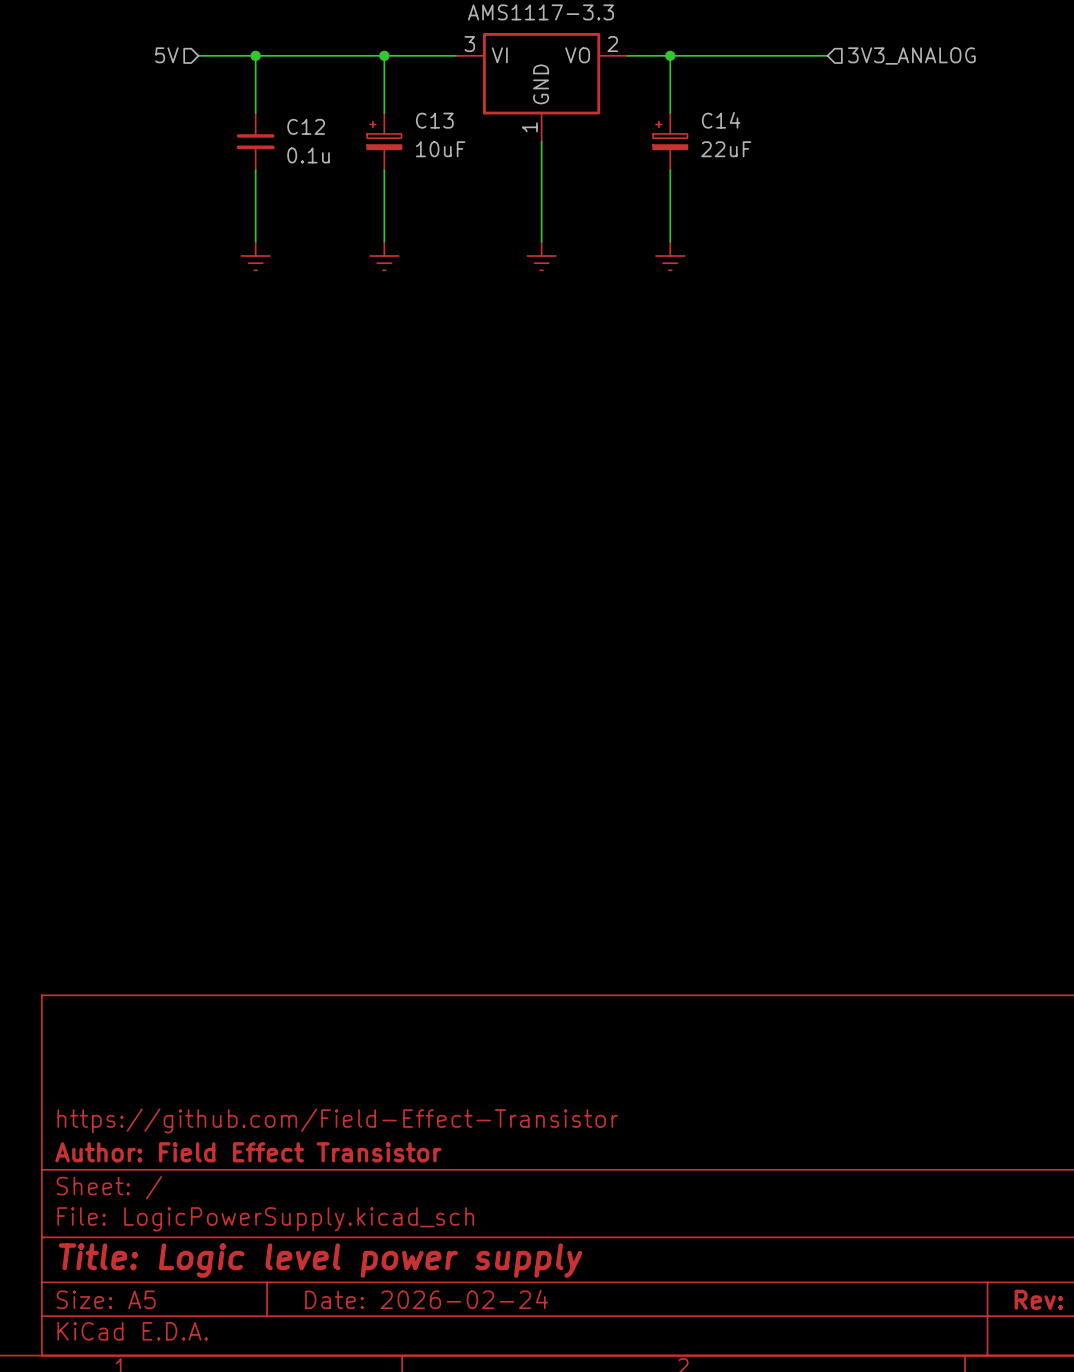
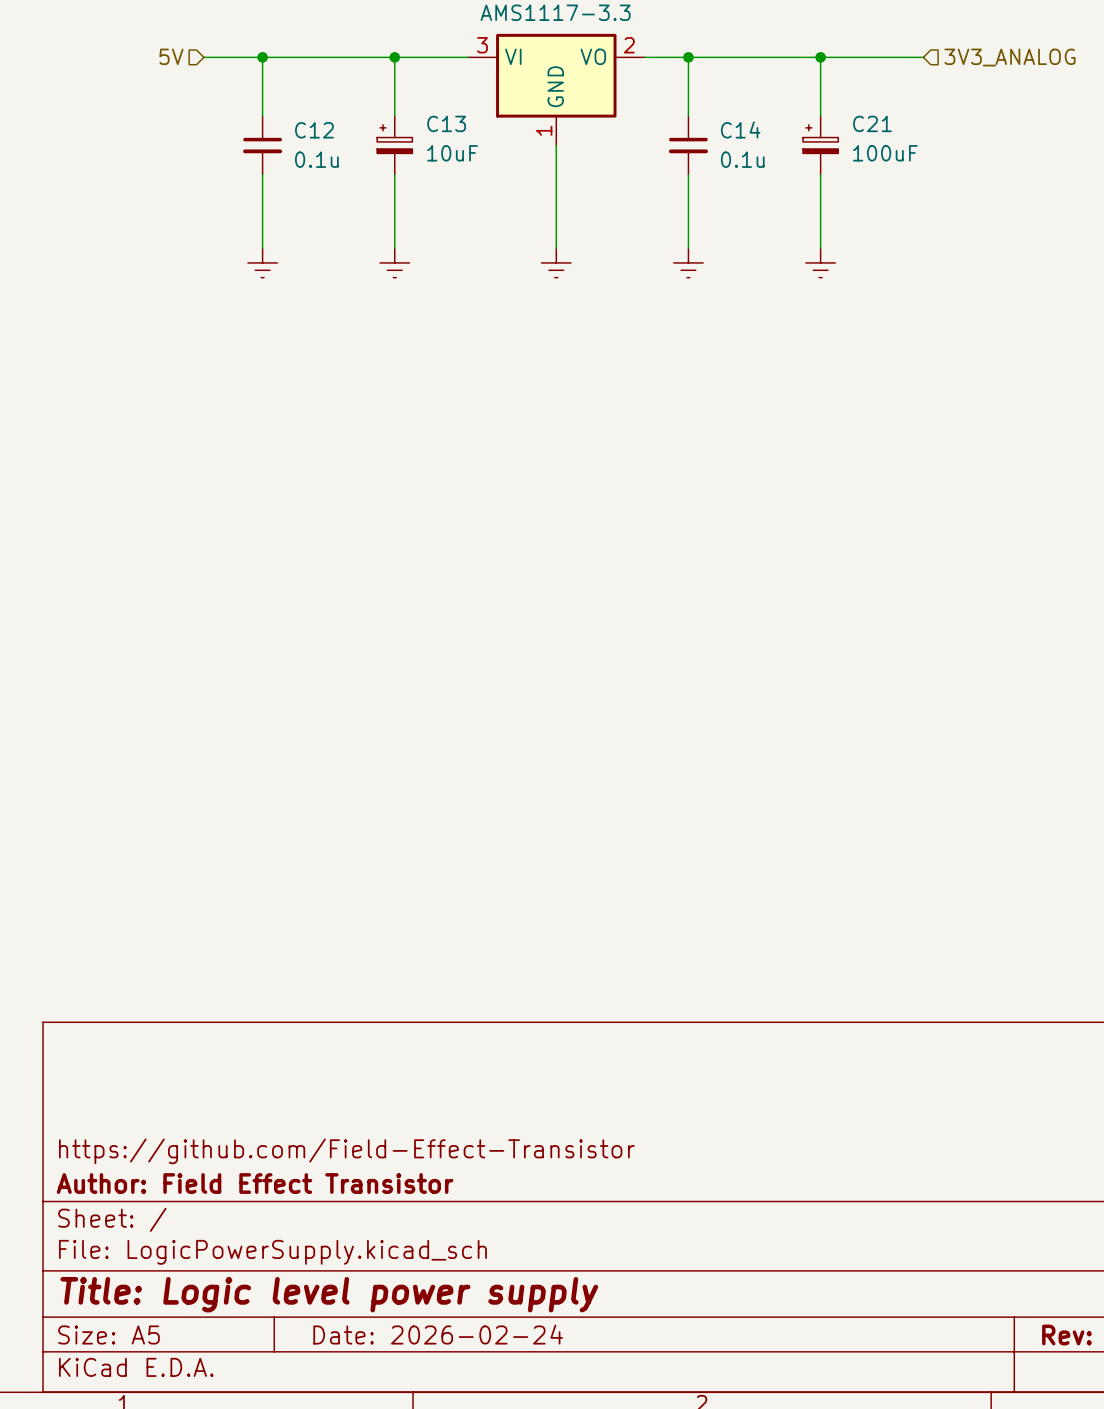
wire: none -> (820, 57) (820, 116)
junction: none -> (820, 57)
wire: none -> (849, 57) (923, 57)
hierarchical label position: 3V3_ANALOG (911, 55) -> 3V3_ANALOG (1010, 57)
C14 symbol: [653, 113, 688, 171] -> [668, 116, 708, 175]
C21: none -> 100uF (820, 145)
C14 value: 22uF (726, 149) -> 0.1u (742, 159)
wire: none -> (820, 174) (820, 248)
power symbol: none -> (820, 262)

